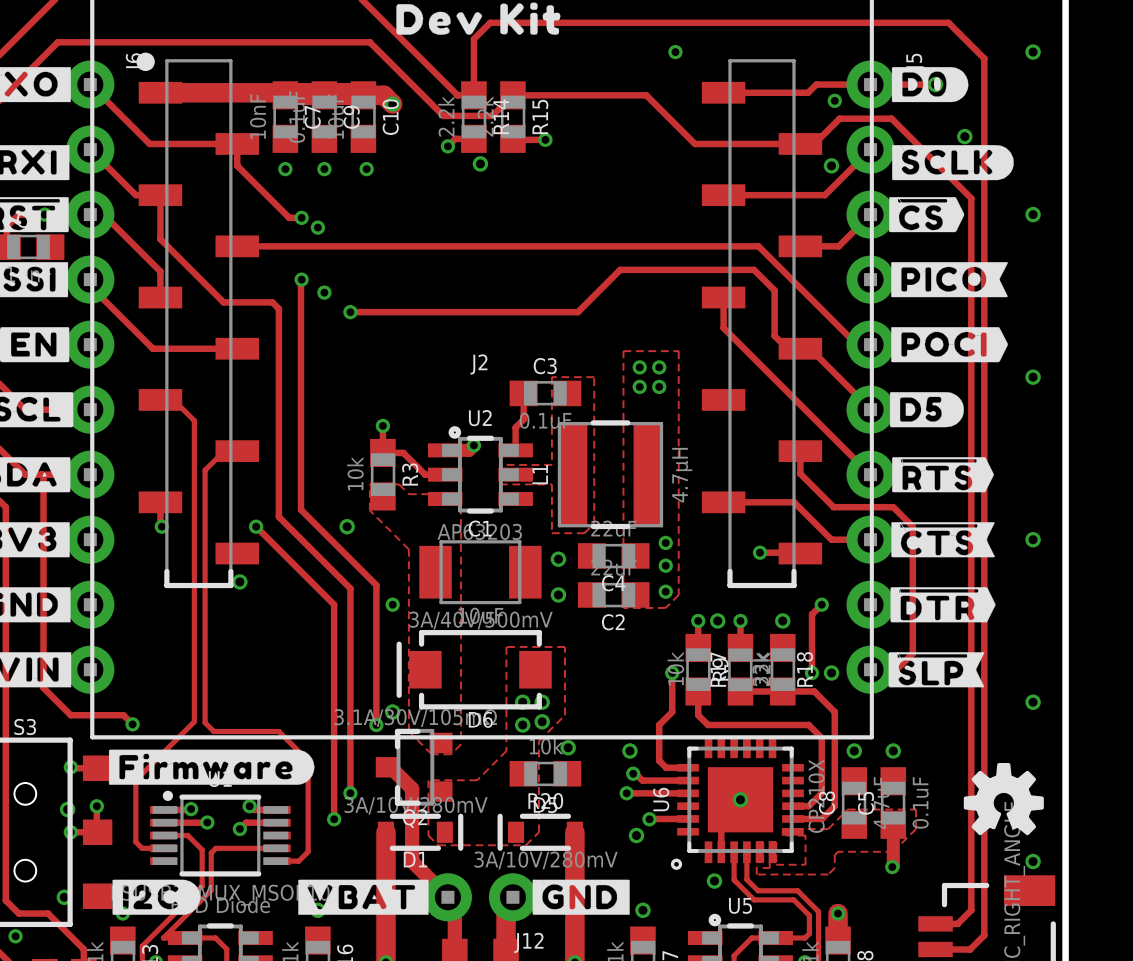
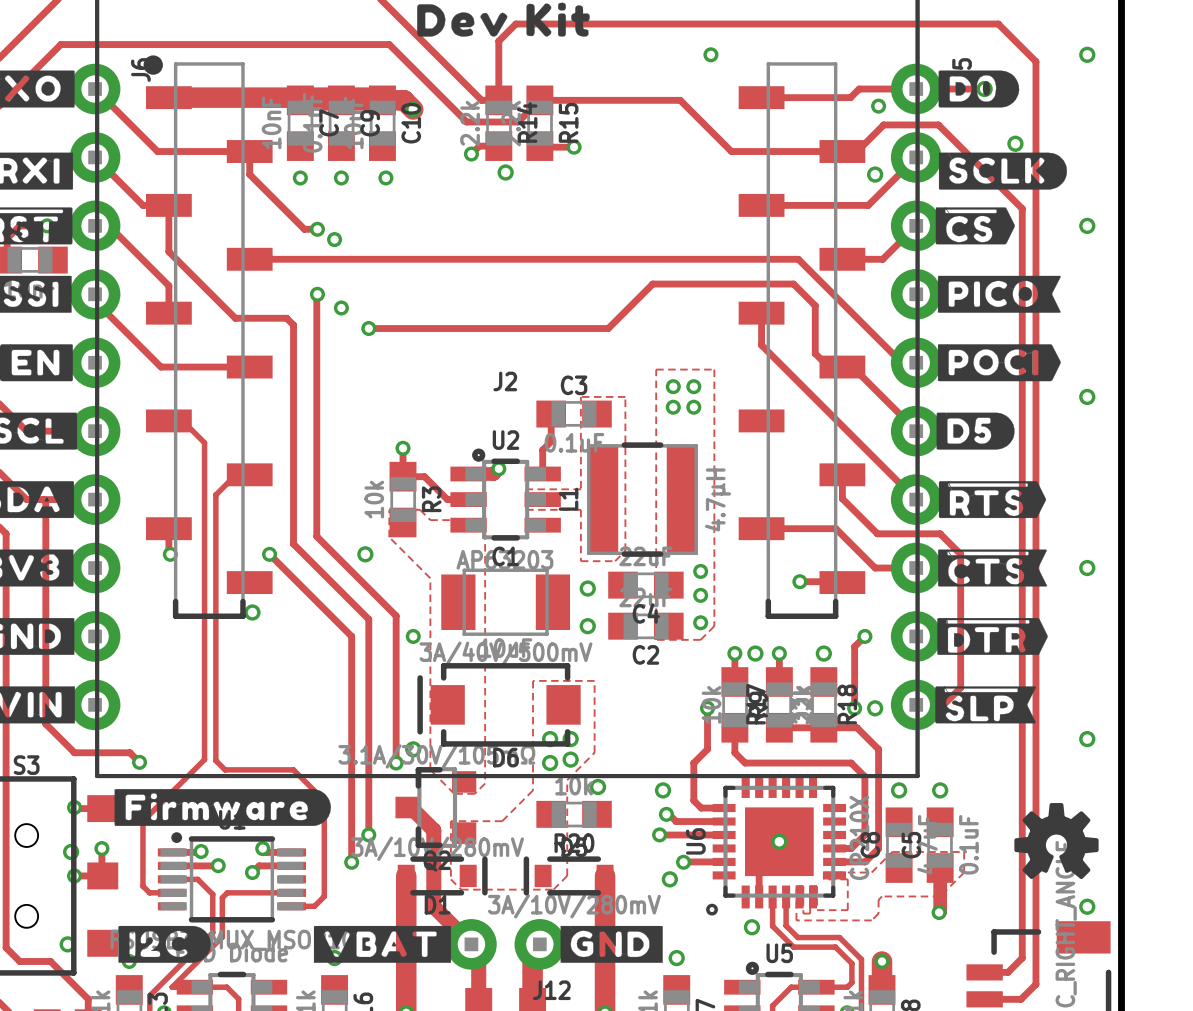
via: (15, 936) -> none

